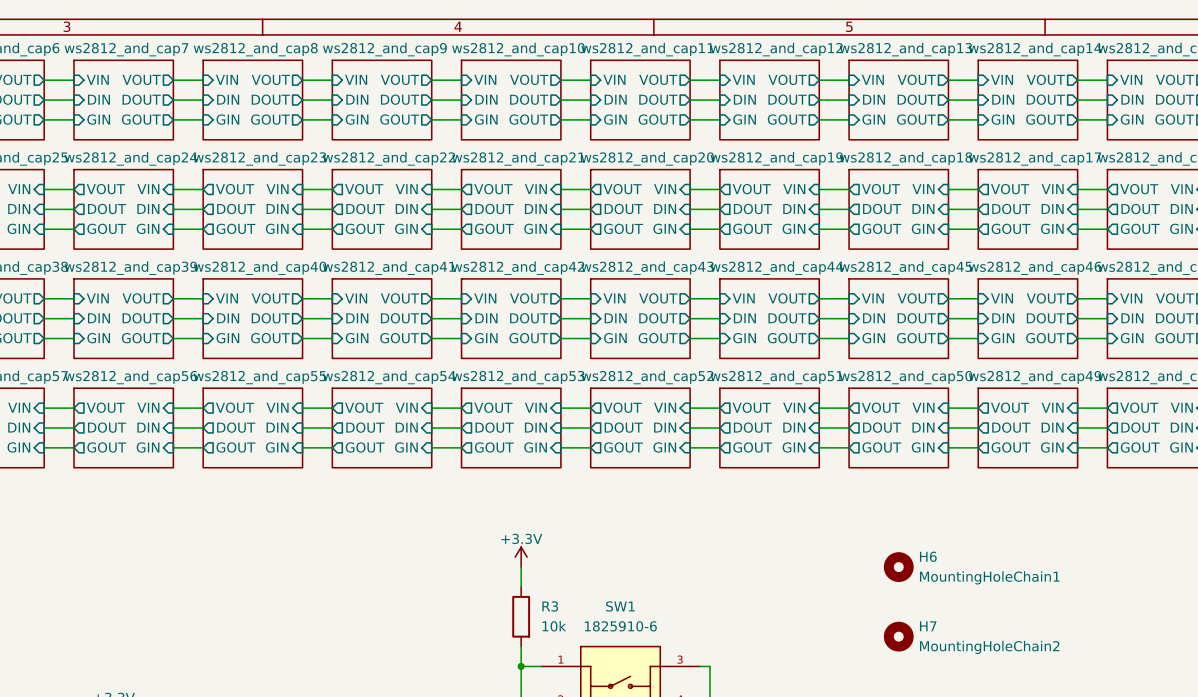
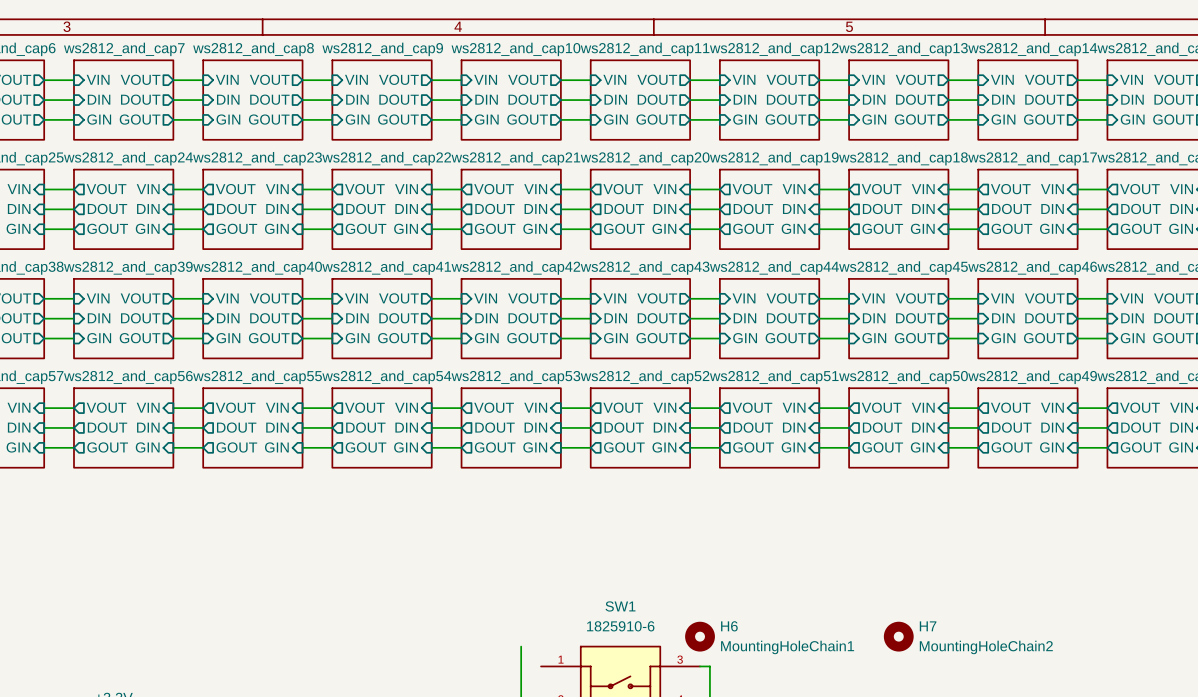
power symbol: +3.3V (521, 557) -> none
wire: (521, 567) (521, 586) -> none
H6 position: (898, 567) -> (700, 636)
R3: 10k (521, 616) -> none
wire: (521, 666) (541, 666) -> none
junction: (521, 666) -> none

